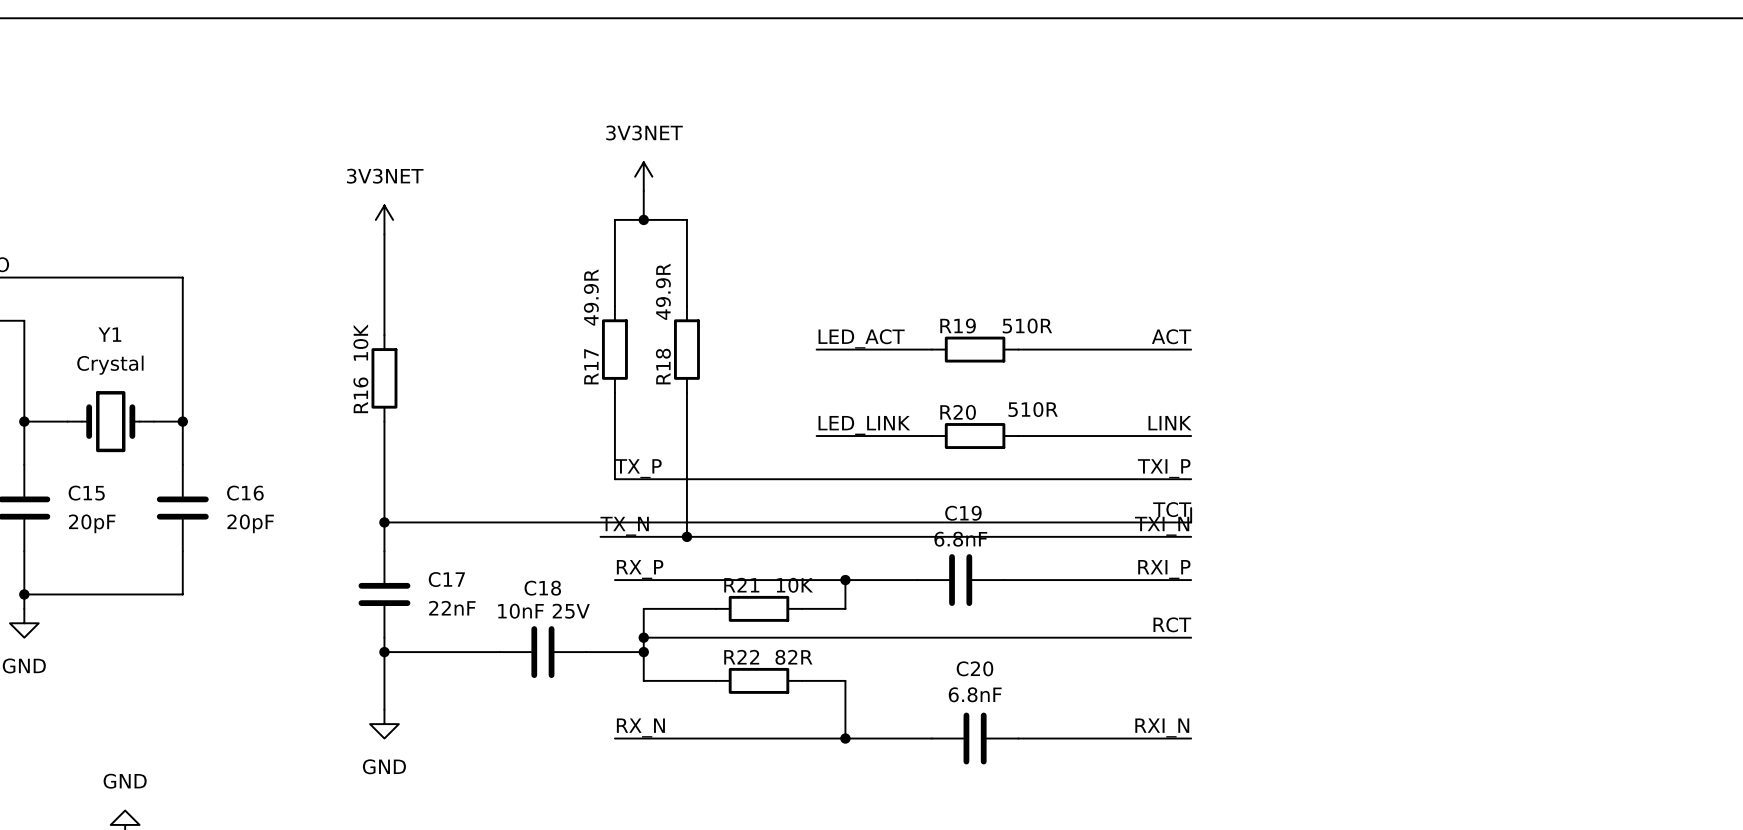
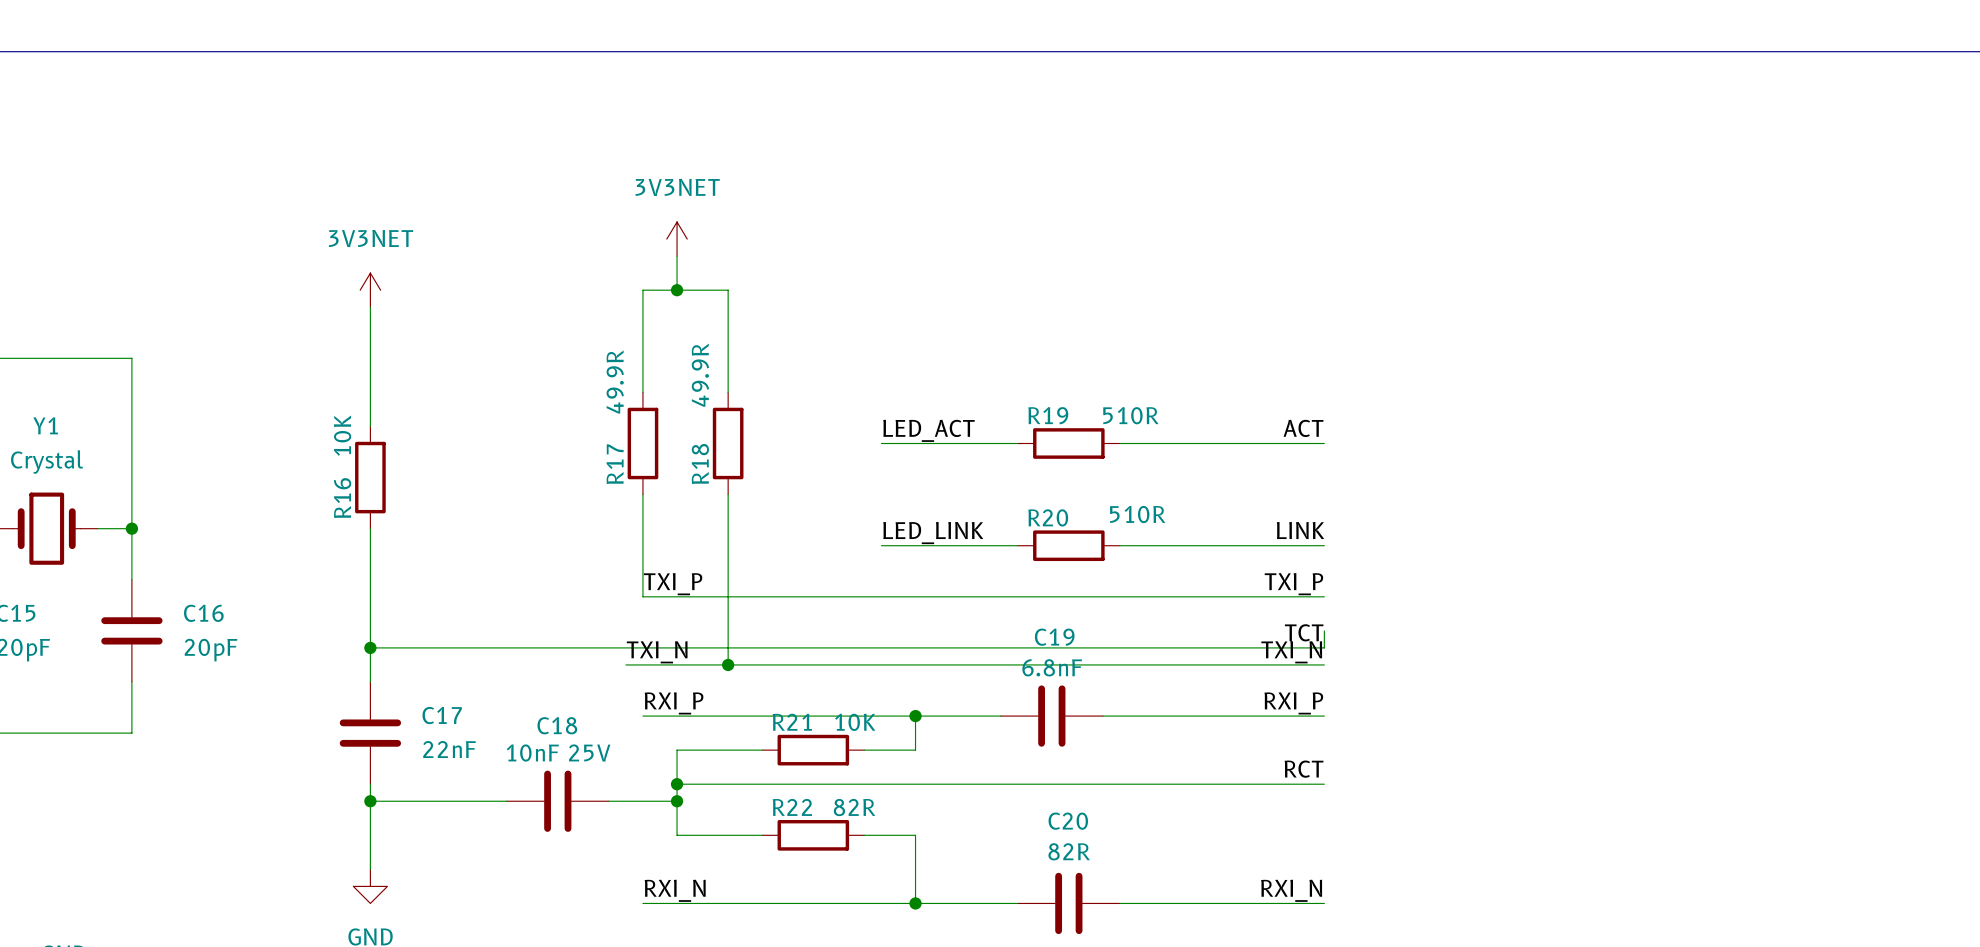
label: TX_P (638, 468) -> TXI_P (673, 584)
label: TX_N (624, 526) -> TXI_N (657, 652)
label: RX_P (640, 569) -> RXI_P (674, 703)
C20 value: 6.8nF (975, 694) -> 82R (1069, 851)
label: RX_N (640, 727) -> RXI_N (675, 890)

